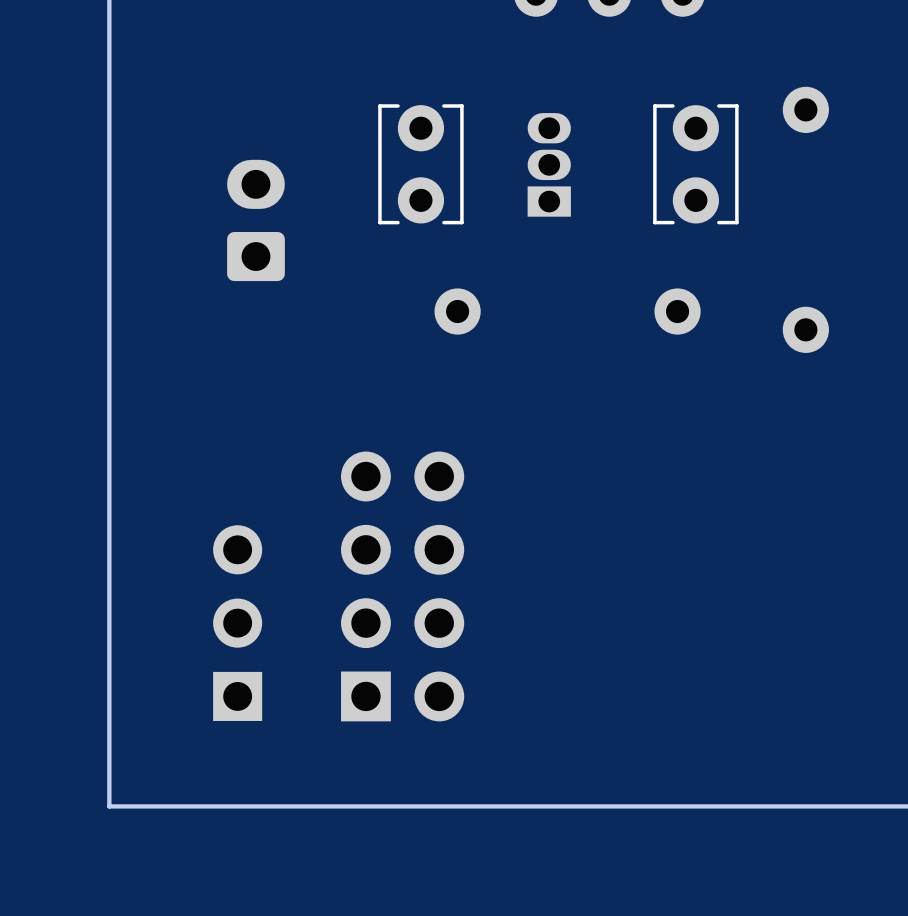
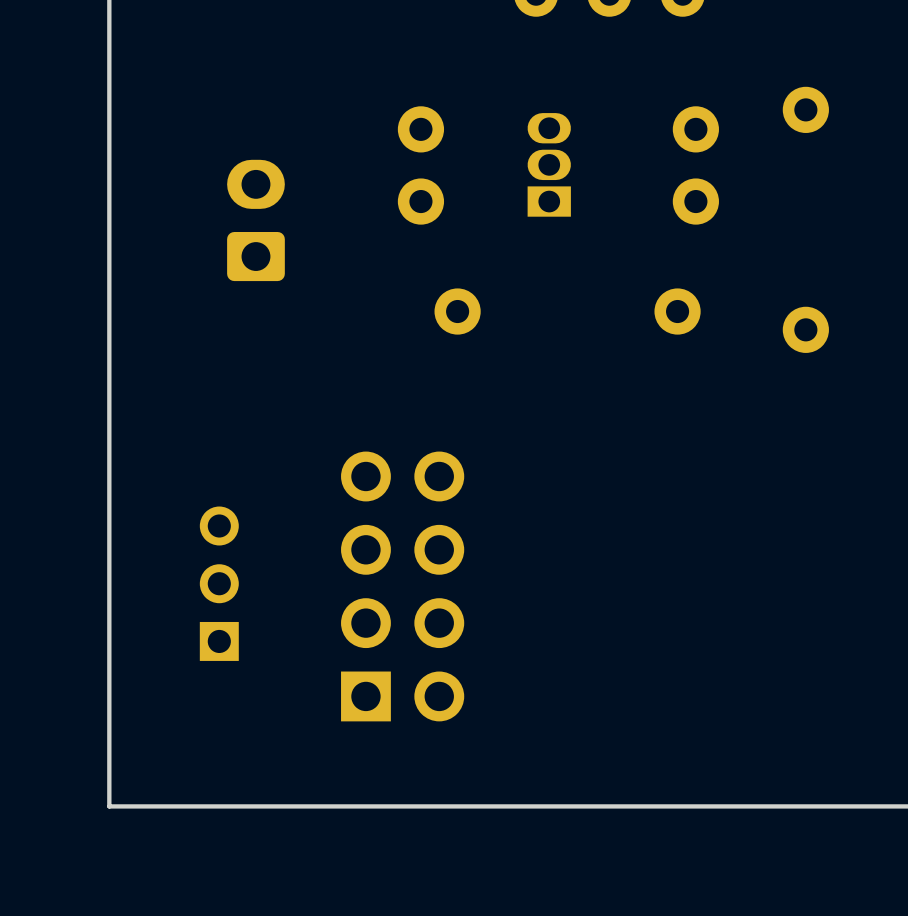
part side: bottom (420, 164) -> top (420, 165)
part side: bottom (695, 164) -> top (695, 165)
part: none -> (219, 583)
part: (237, 623) -> none

